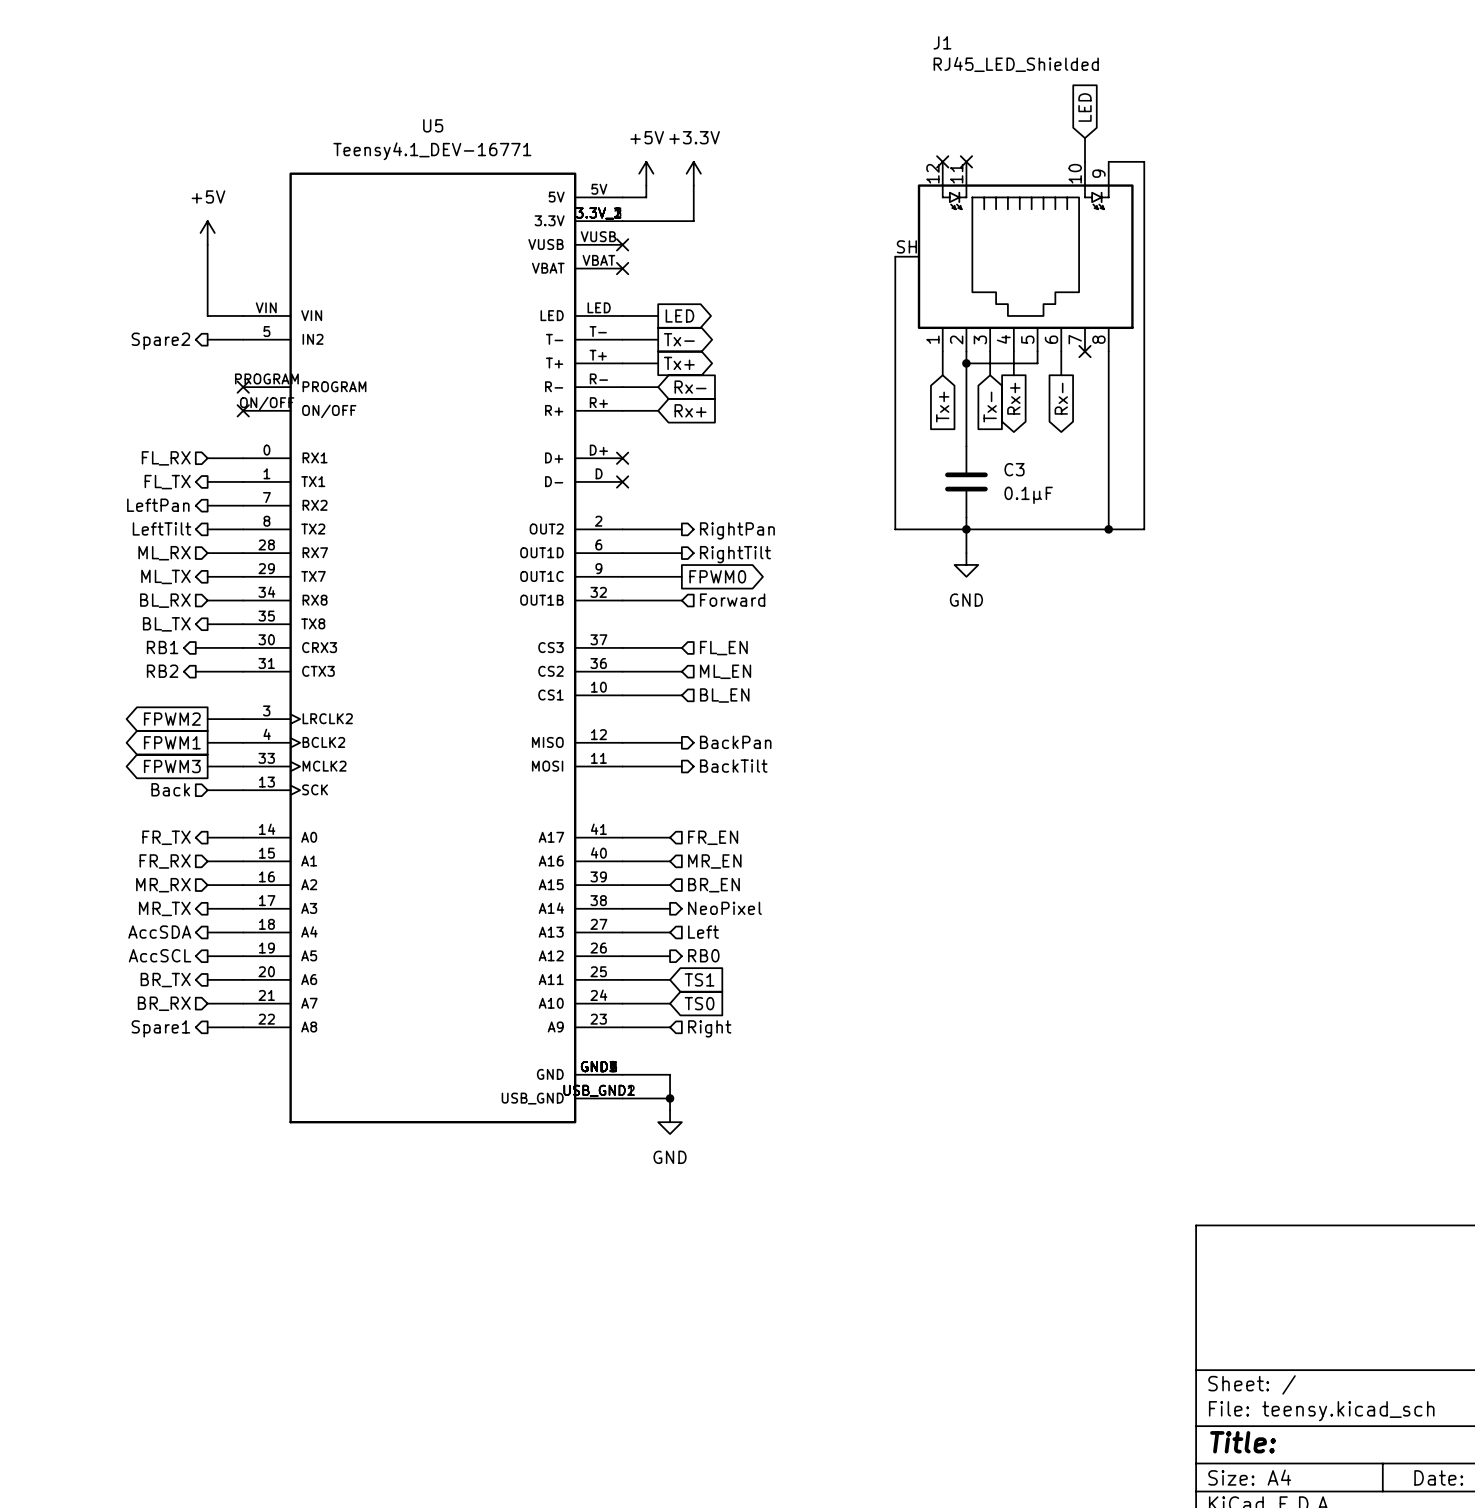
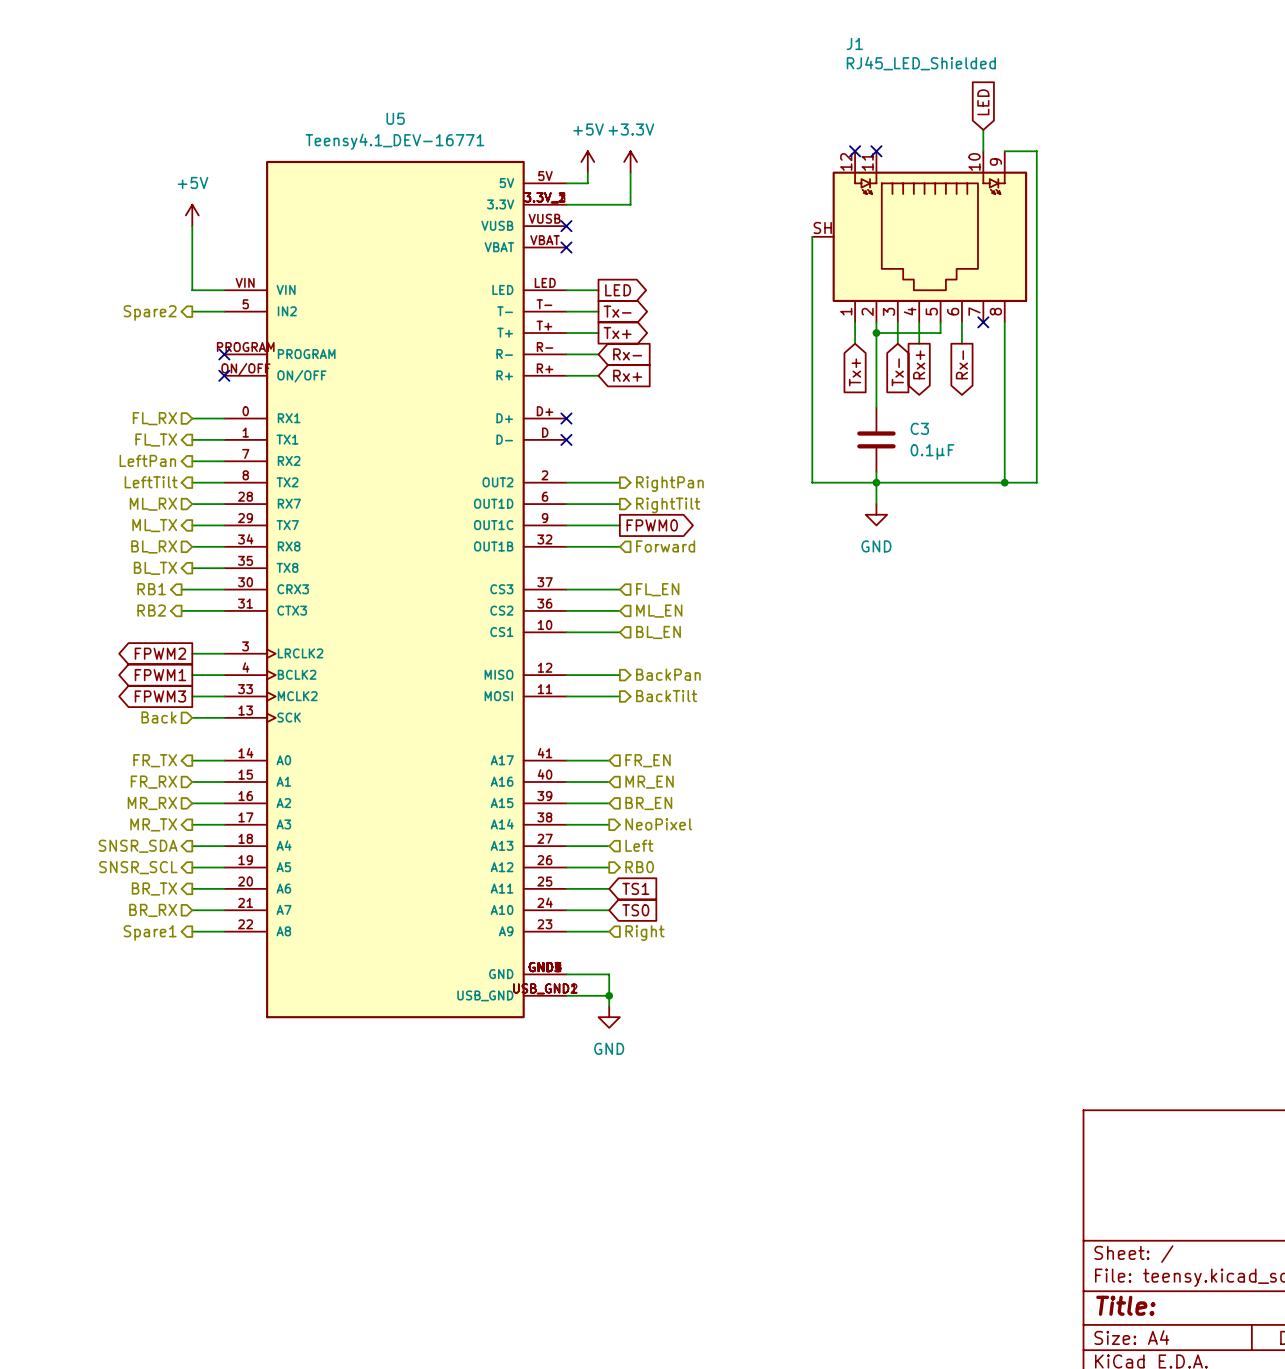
hierarchical label: AccSDA (159, 932) -> SNSR_SDA (138, 846)
hierarchical label: AccSCL (160, 955) -> SNSR_SCL (138, 867)

